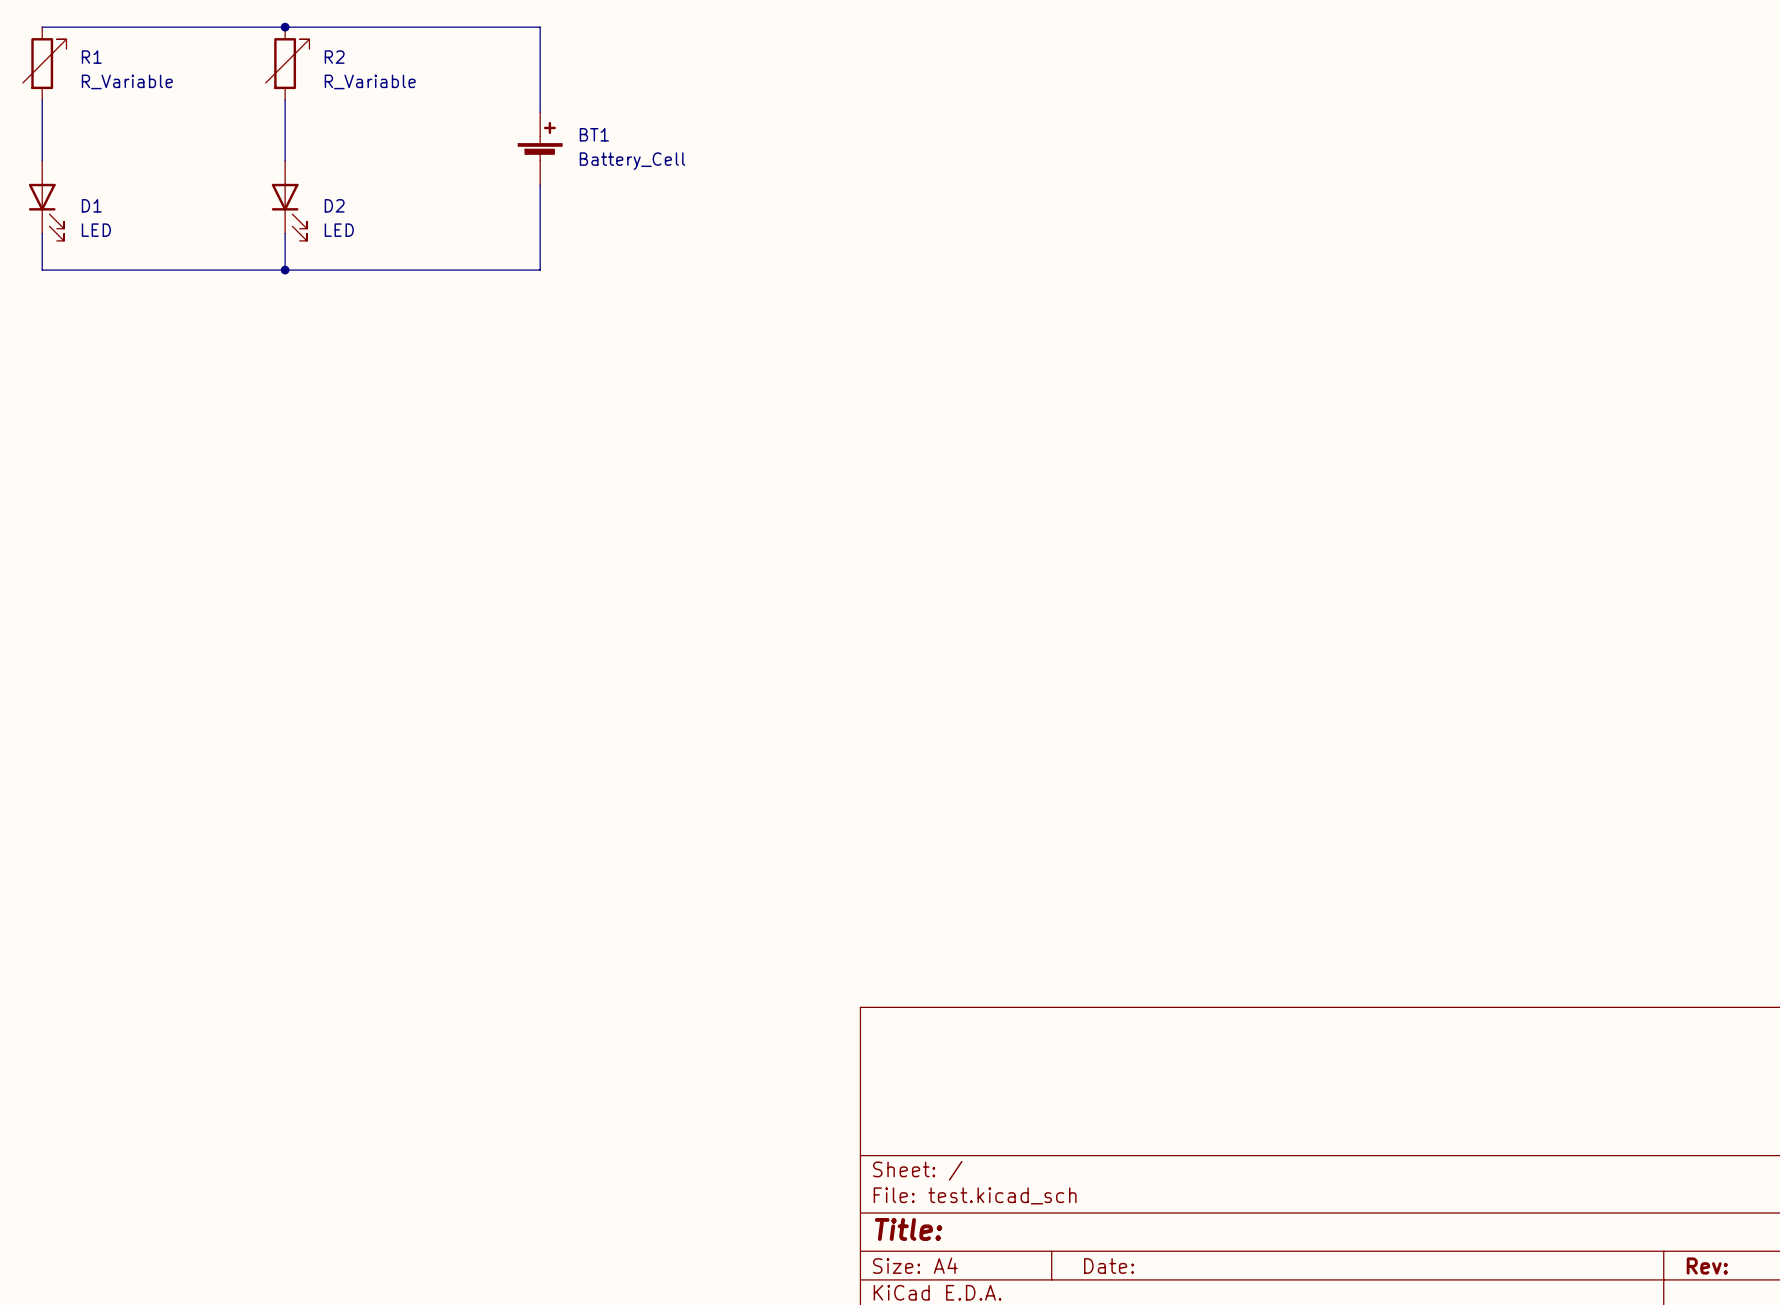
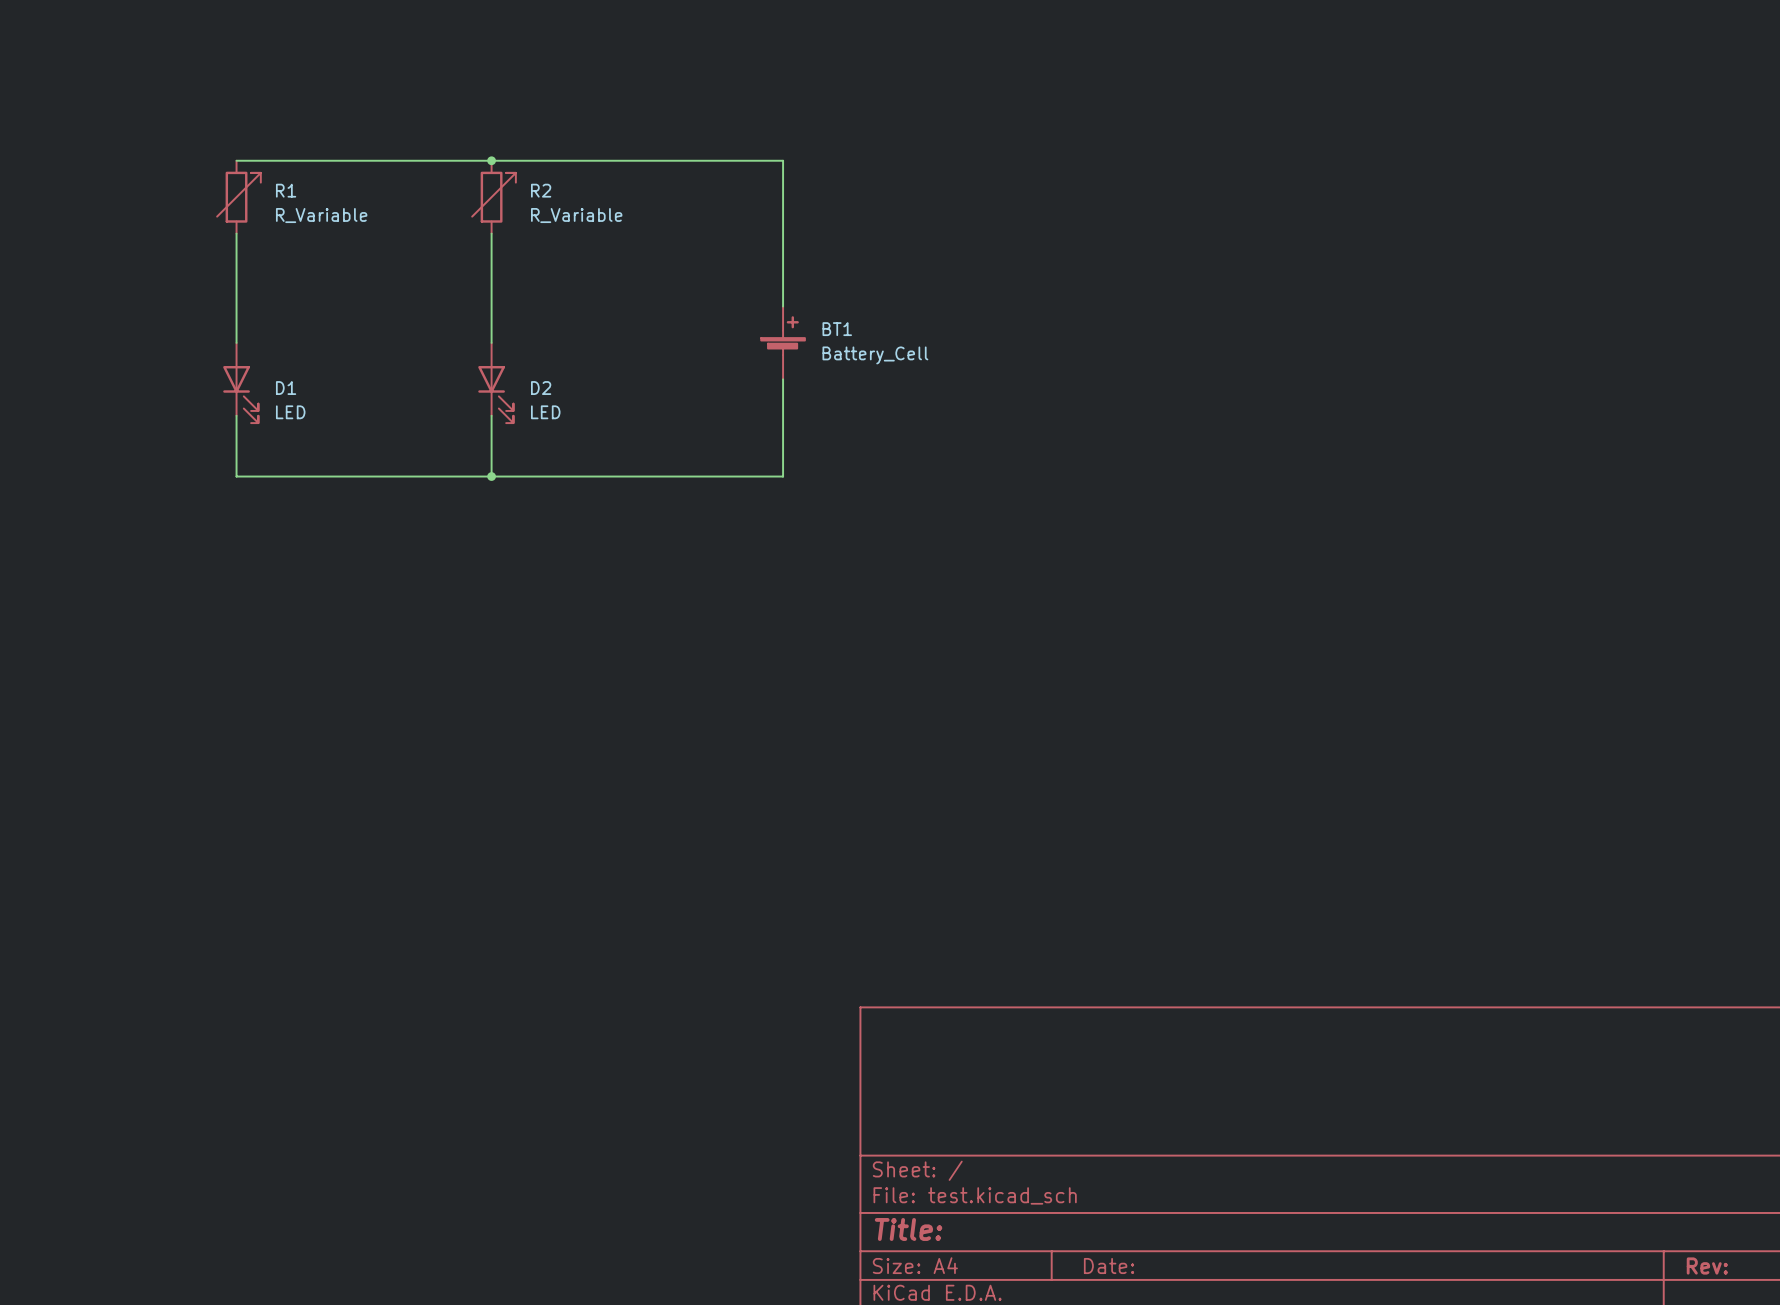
wire: (42, 27) (540, 27) (540, 112) -> none
junction: (285, 27) -> none
R1 position: (44, 63) -> (238, 197)
R2 position: (287, 63) -> (494, 197)
wire: (42, 100) (42, 160) -> none
wire: (285, 100) (285, 160) -> none
BT1 position: (540, 148) -> (783, 342)
wire: none -> (236, 160) (783, 160) (783, 306)
junction: none -> (491, 160)
wire: (540, 185) (540, 270) (42, 270) (42, 233) -> none
D1 position: (46, 200) -> (240, 383)
D2 position: (289, 200) -> (495, 383)
wire: none -> (236, 233) (236, 342)
wire: (285, 233) (285, 270) -> none
wire: none -> (491, 233) (491, 342)
junction: (285, 270) -> none
wire: none -> (783, 379) (783, 476) (236, 476) (236, 415)
wire: none -> (491, 415) (491, 476)
junction: none -> (491, 476)

